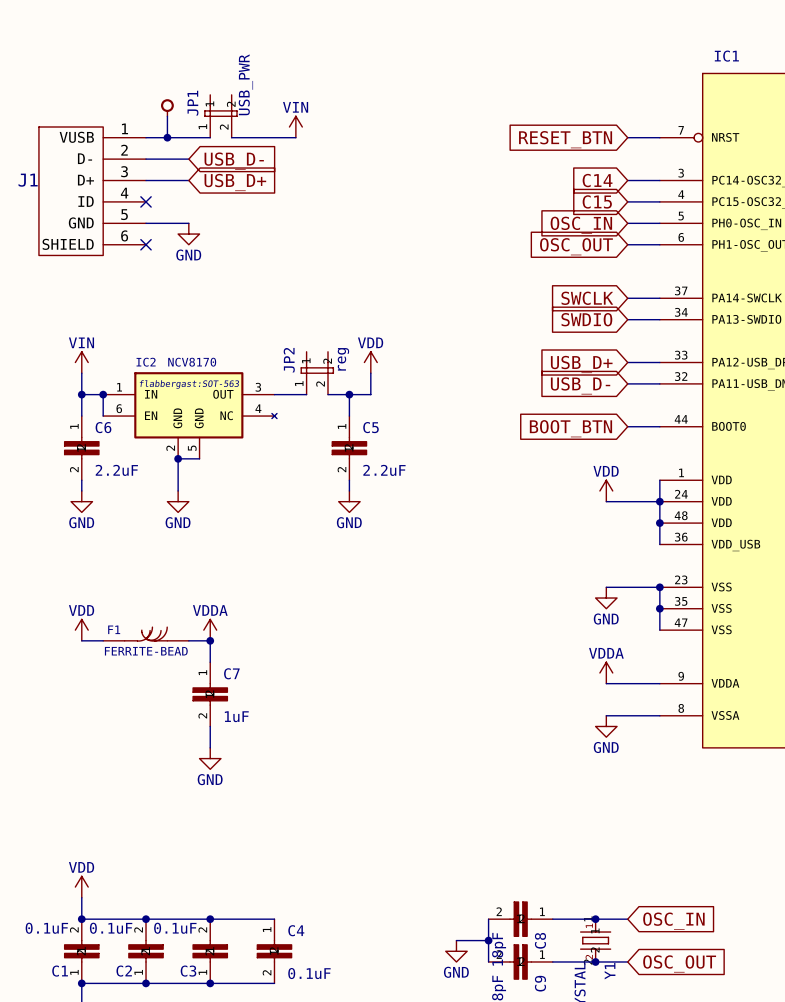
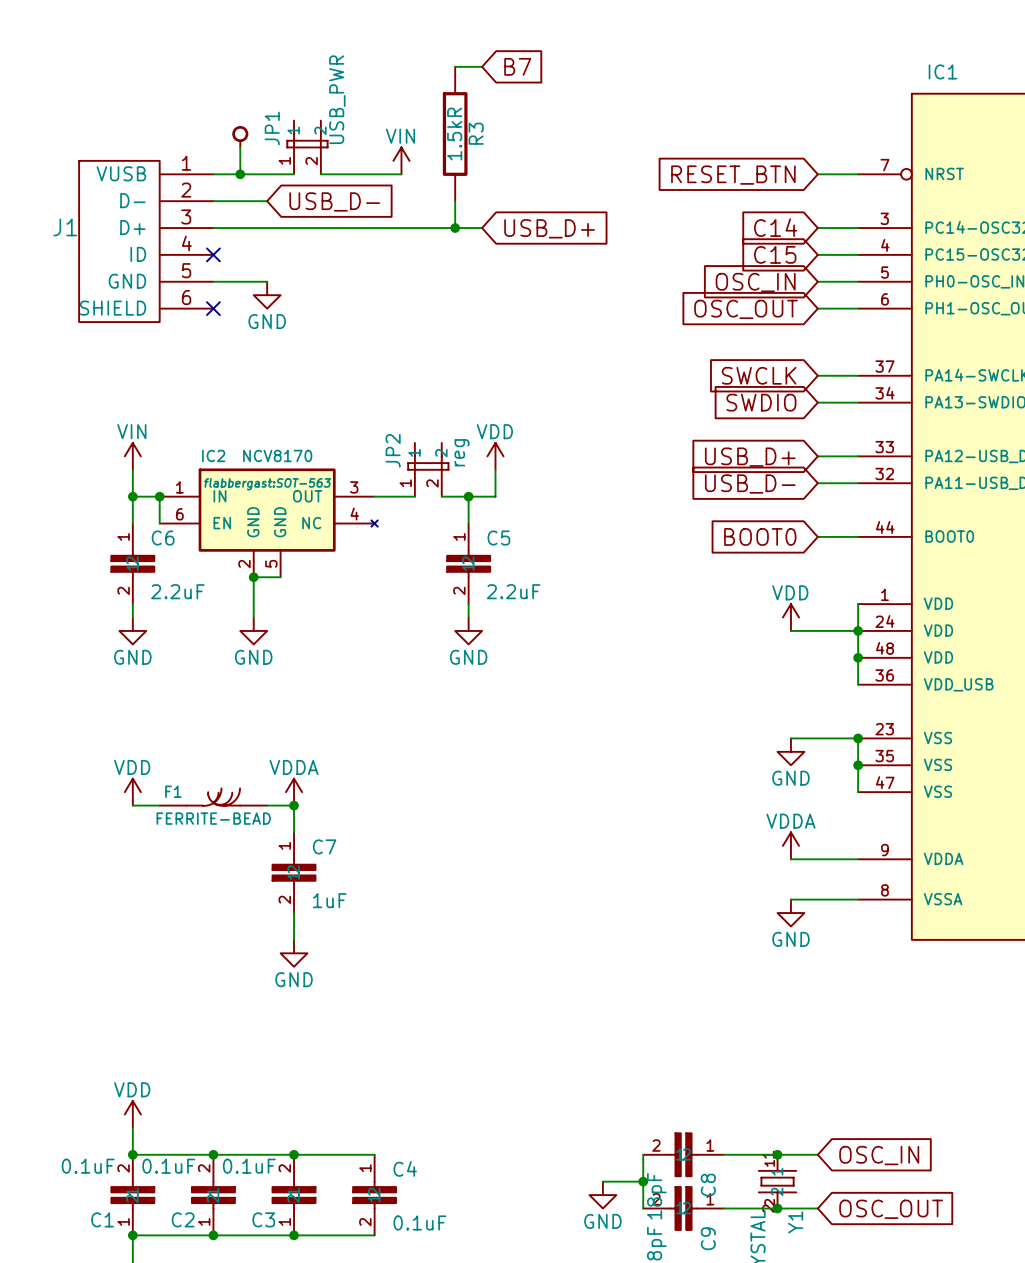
wire: none -> (455, 66) (482, 66)
global label: none -> B7 (517, 66)
R3: none -> 1.5kR (455, 134)
wire: none -> (455, 201) (455, 228)
wire: none -> (267, 228) (482, 228)
junction: none -> (455, 228)
global label position: USB_D+ (235, 182) -> USB_D+ (549, 228)
global label: BOOT_BTN (570, 428) -> BOOT0 (760, 536)

